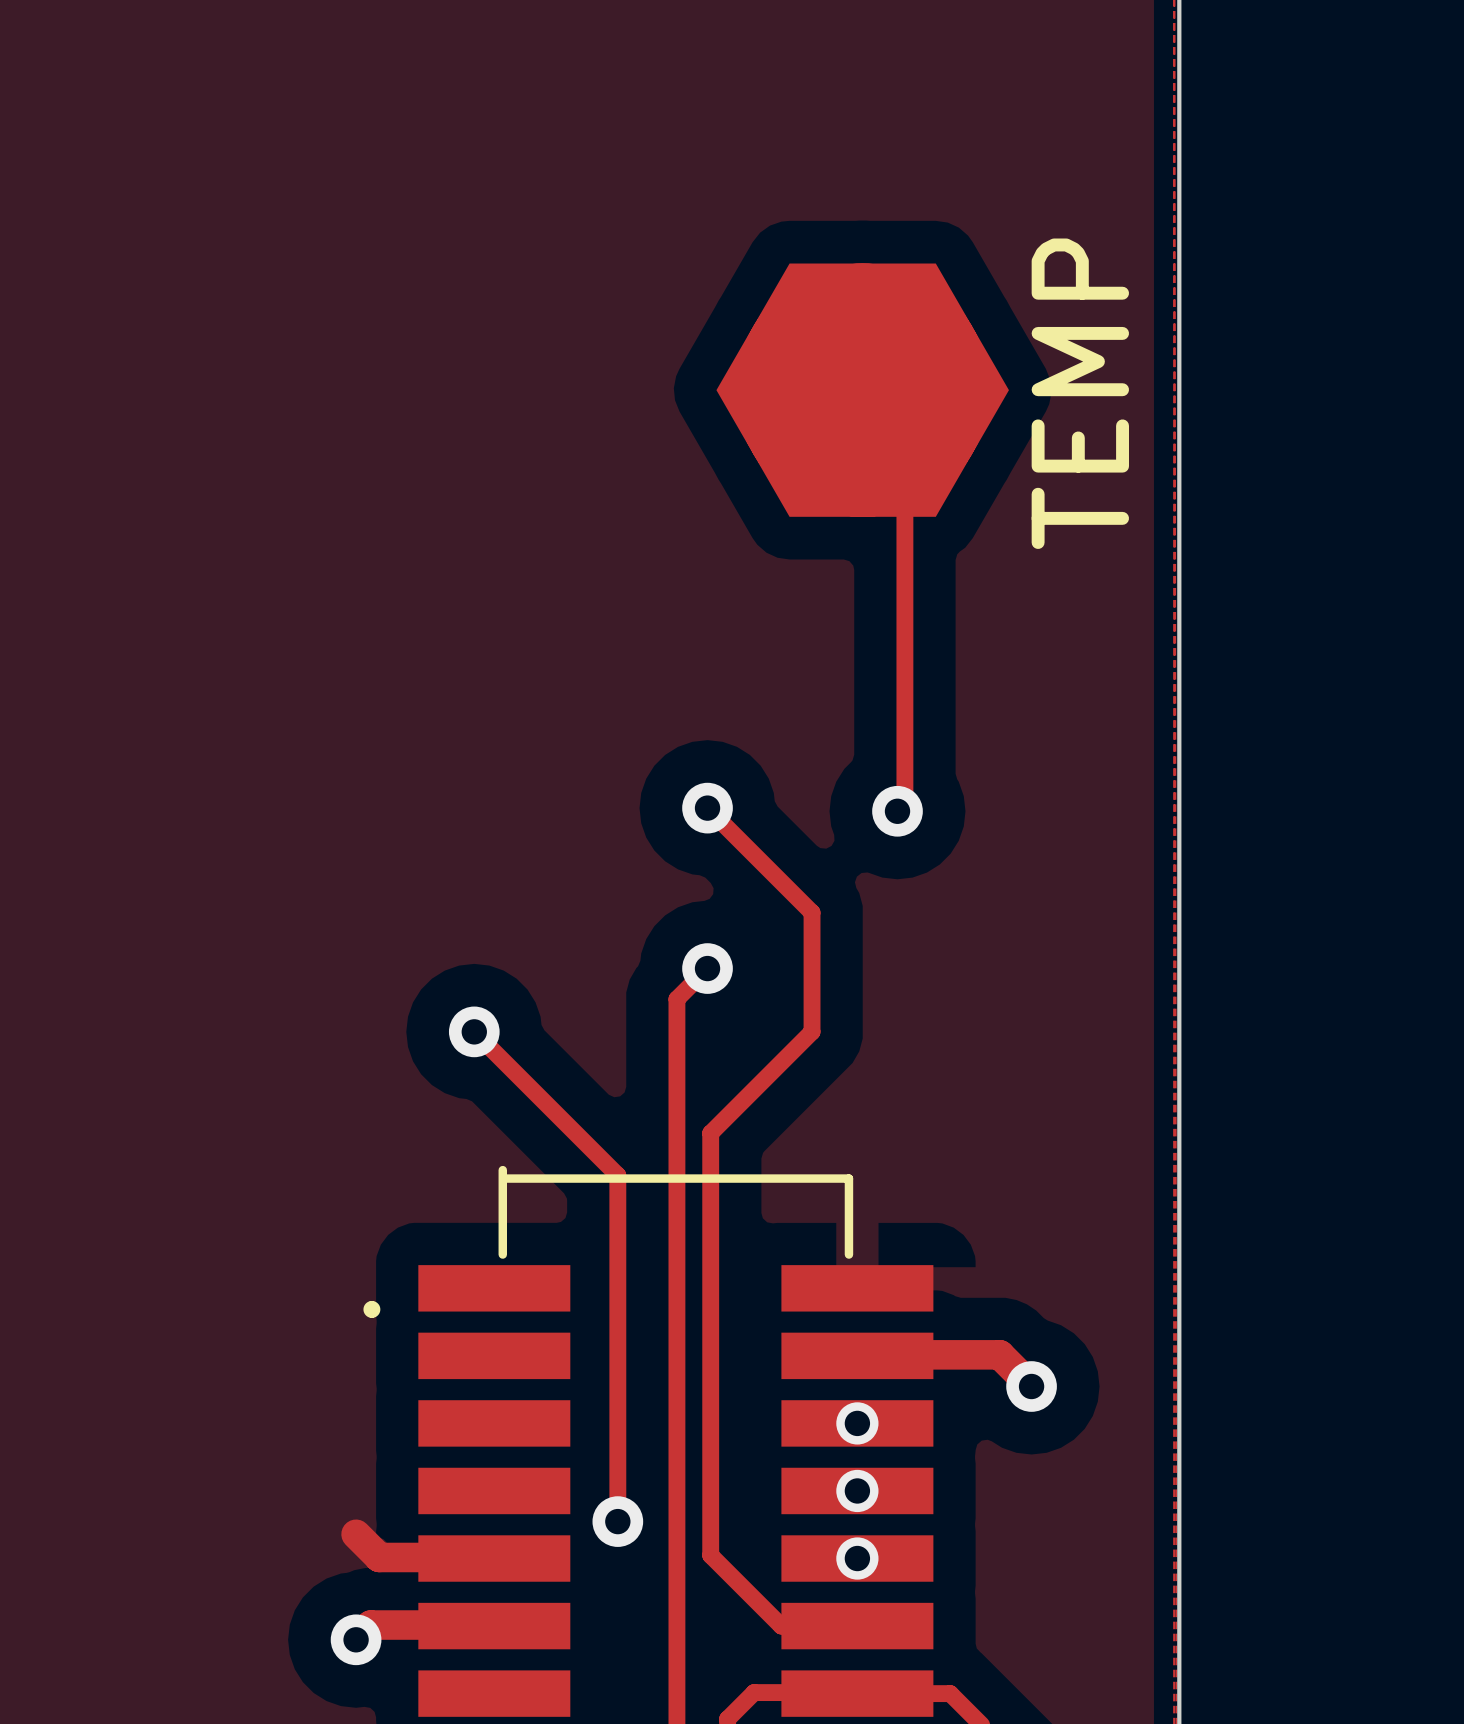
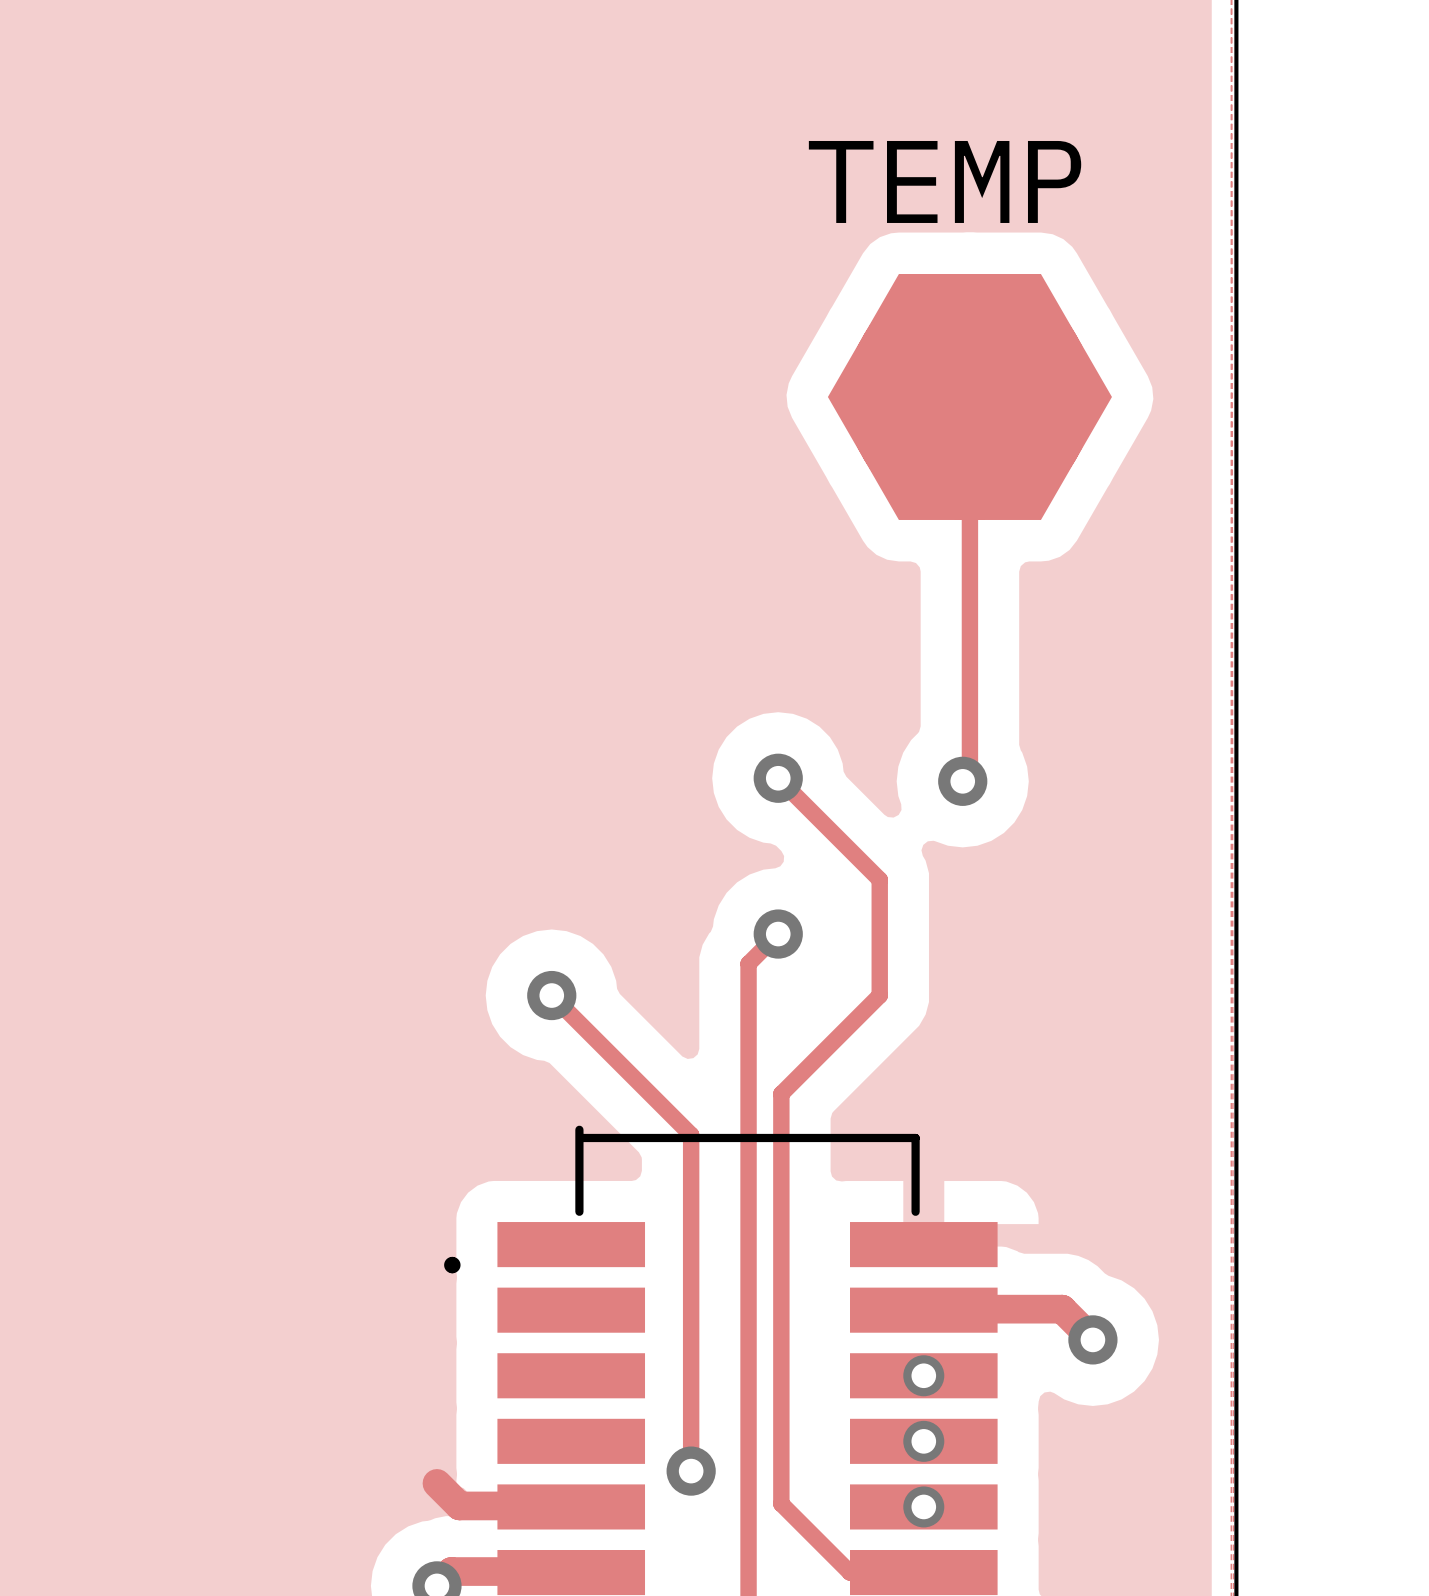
part position: (862, 390) -> (969, 396)
text rotation: 0° (1080, 393) -> 90° clockwise (945, 181)

